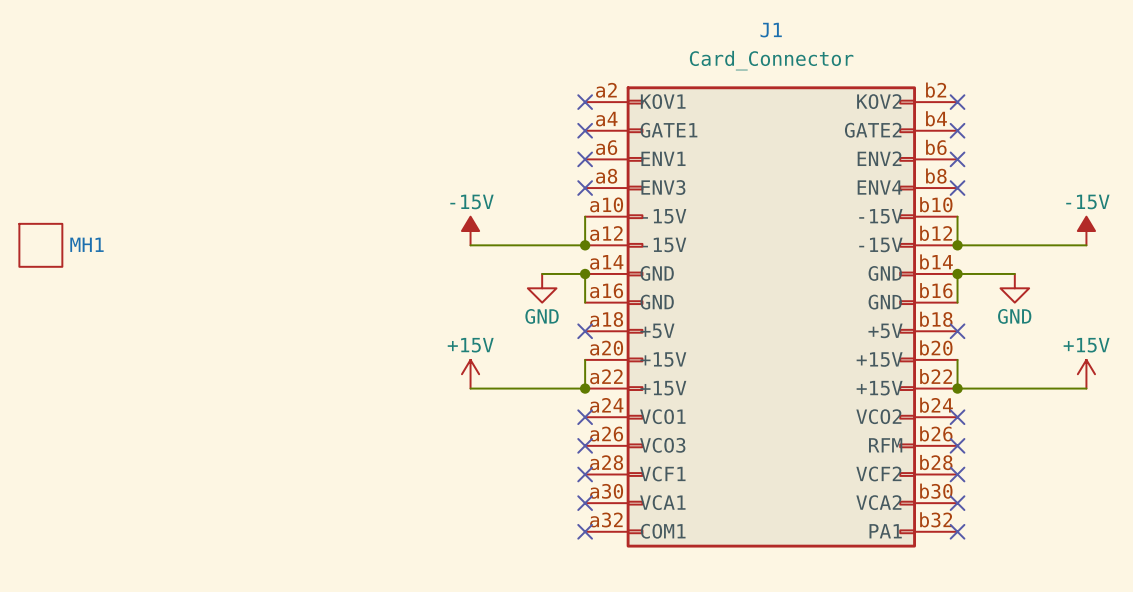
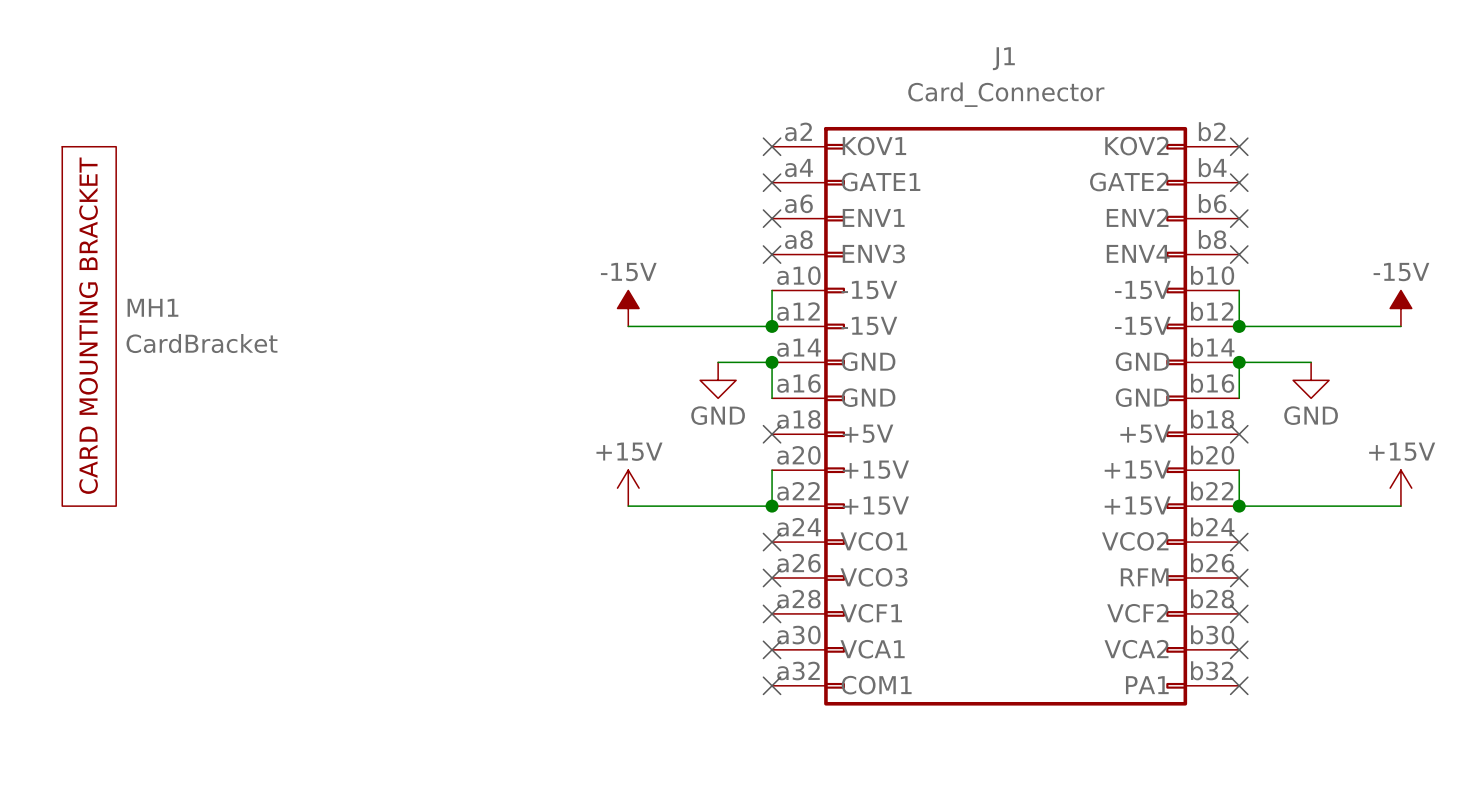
MH1 symbol: [19, 223, 63, 267] -> [62, 146, 117, 507]
MH1 value: none -> CardBracket (201, 343)

